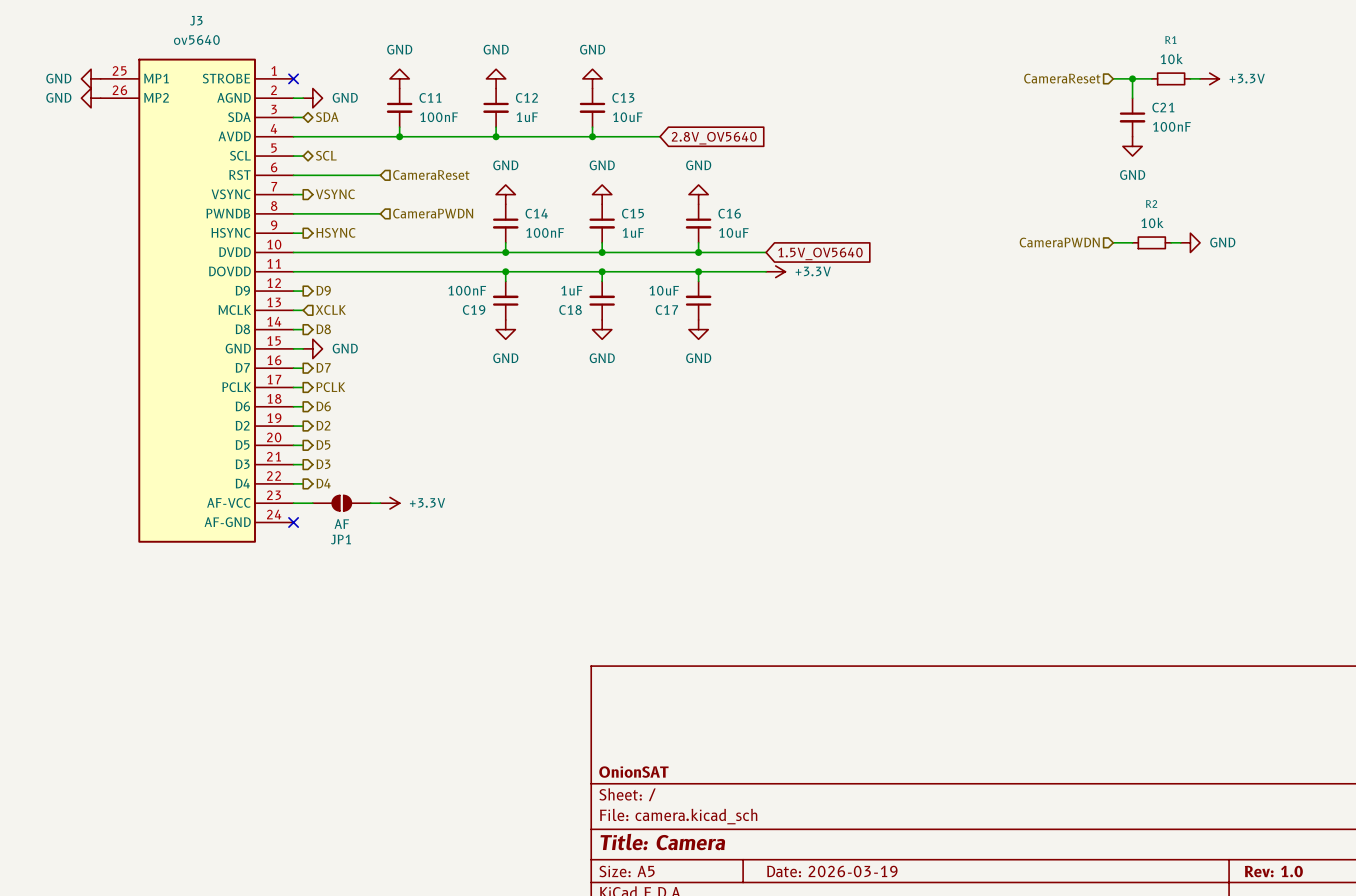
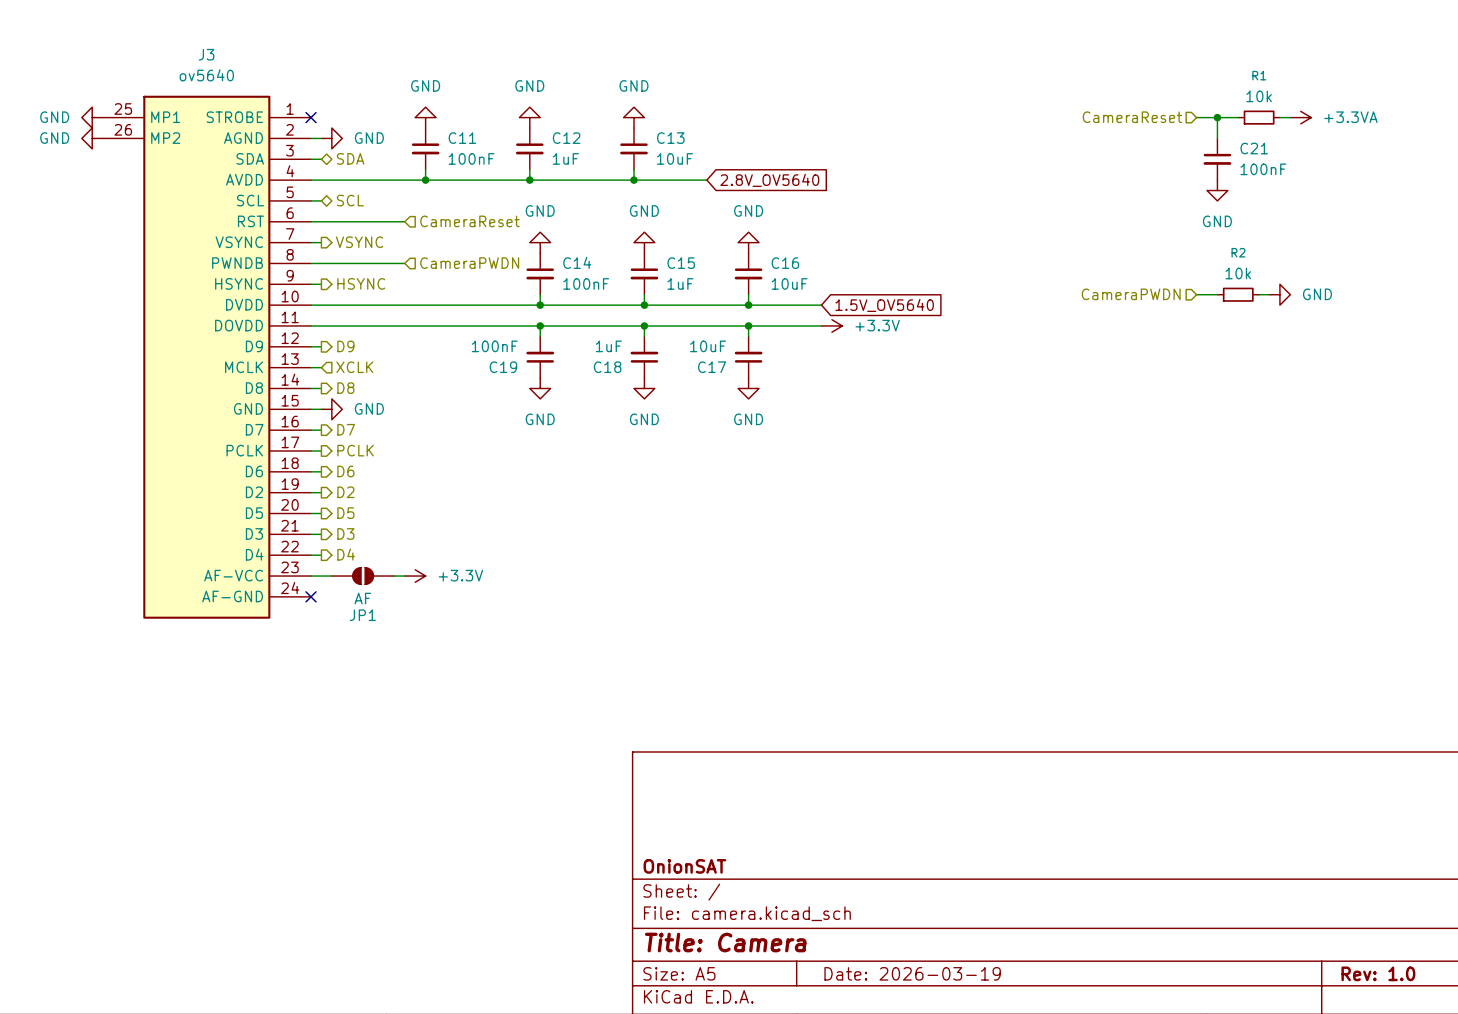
power symbol: +3.3V (1209, 78) -> +3.3VA (1300, 117)

